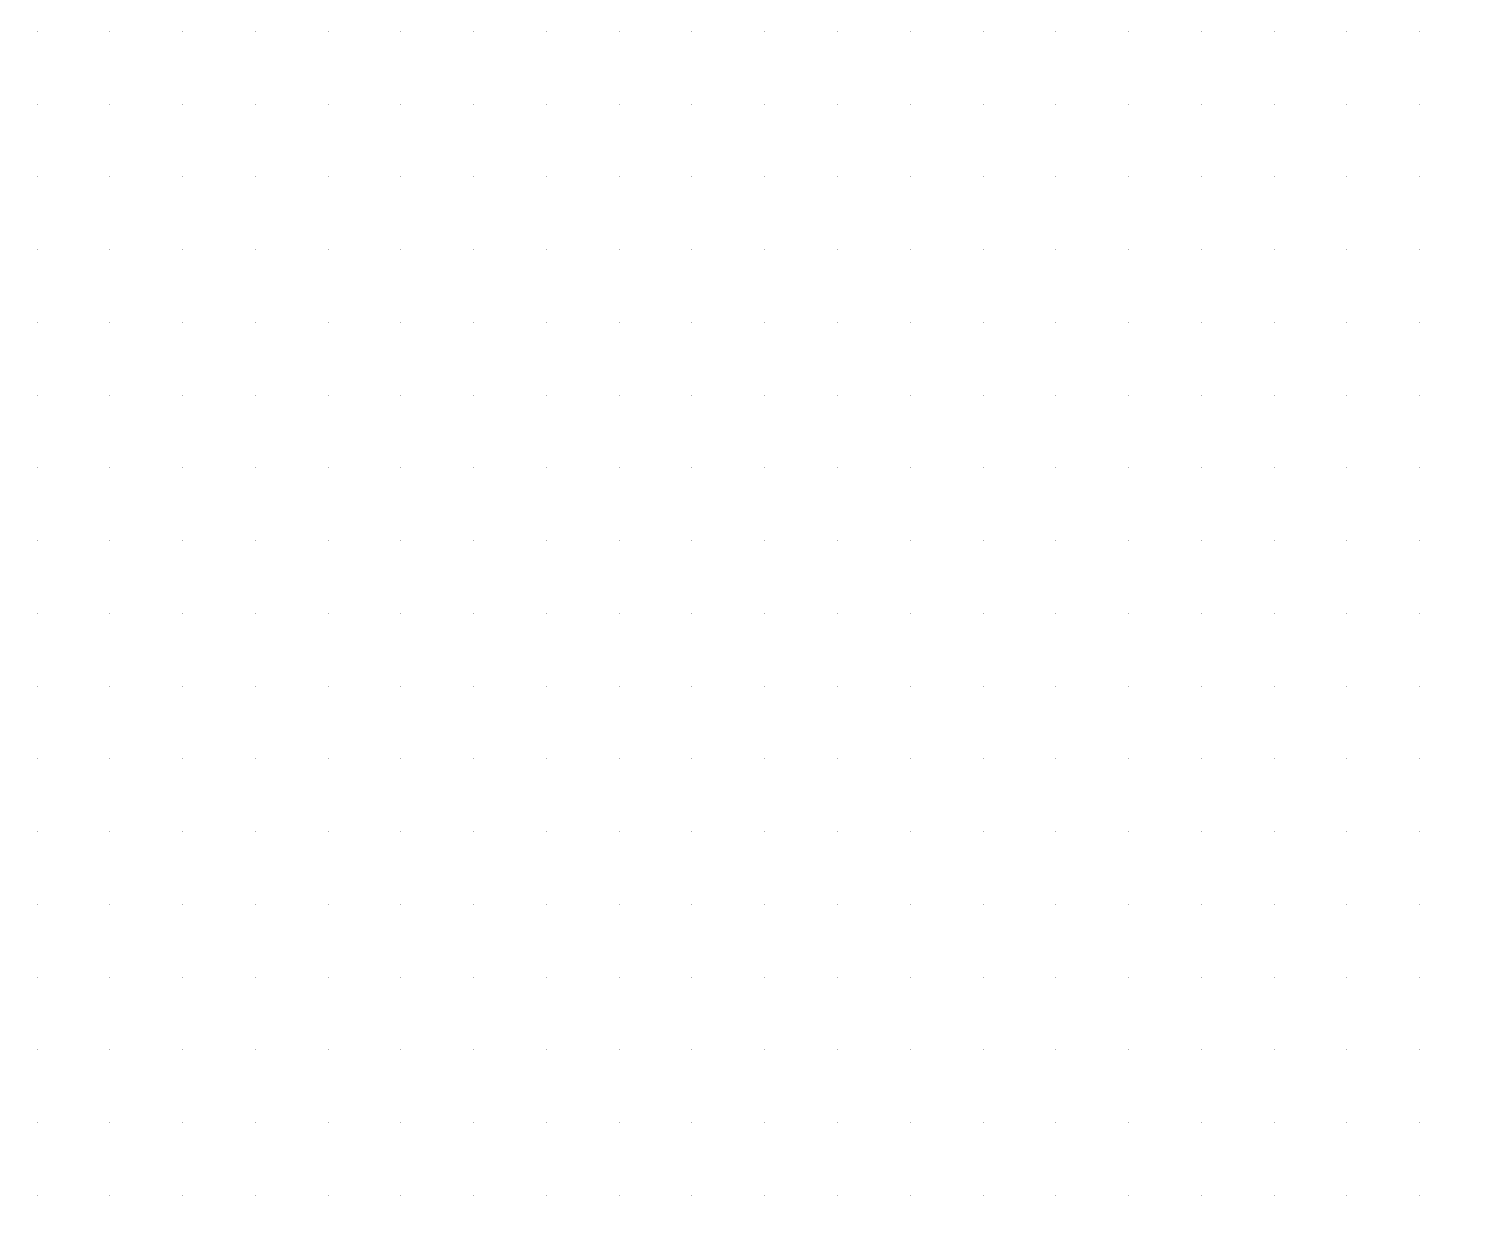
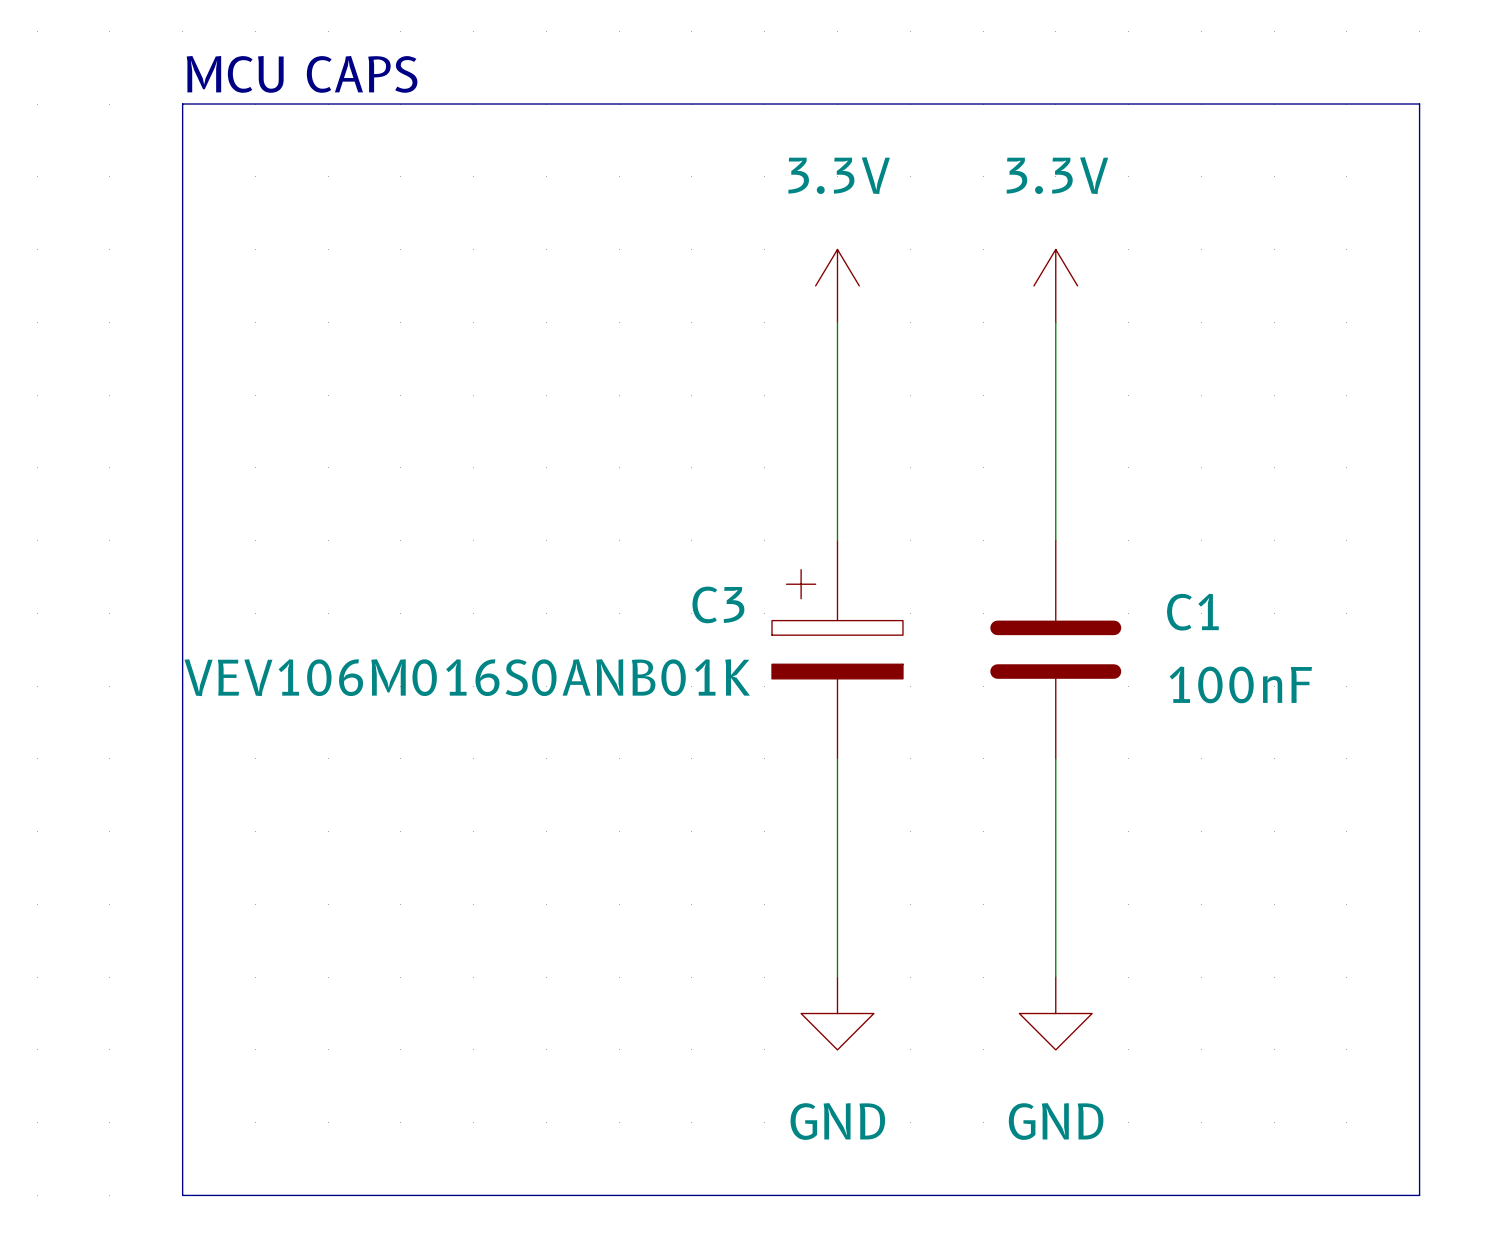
text: none -> MCU CAPS (302, 74)
line: none -> (182, 104) (1419, 104) (1419, 1195) (182, 1195) (182, 104)
power symbol: none -> 3.3V (837, 285)
power symbol: none -> 3.3V (1055, 285)
wire: none -> (837, 322) (837, 540)
wire: none -> (1055, 322) (1055, 540)
C3: none -> VEV106M016S0ANB01K (837, 649)
C1: none -> 100nF (1055, 649)
wire: none -> (837, 758) (837, 977)
wire: none -> (1055, 758) (1055, 977)
power symbol: none -> GND (837, 1013)
power symbol: none -> GND (1055, 1013)

